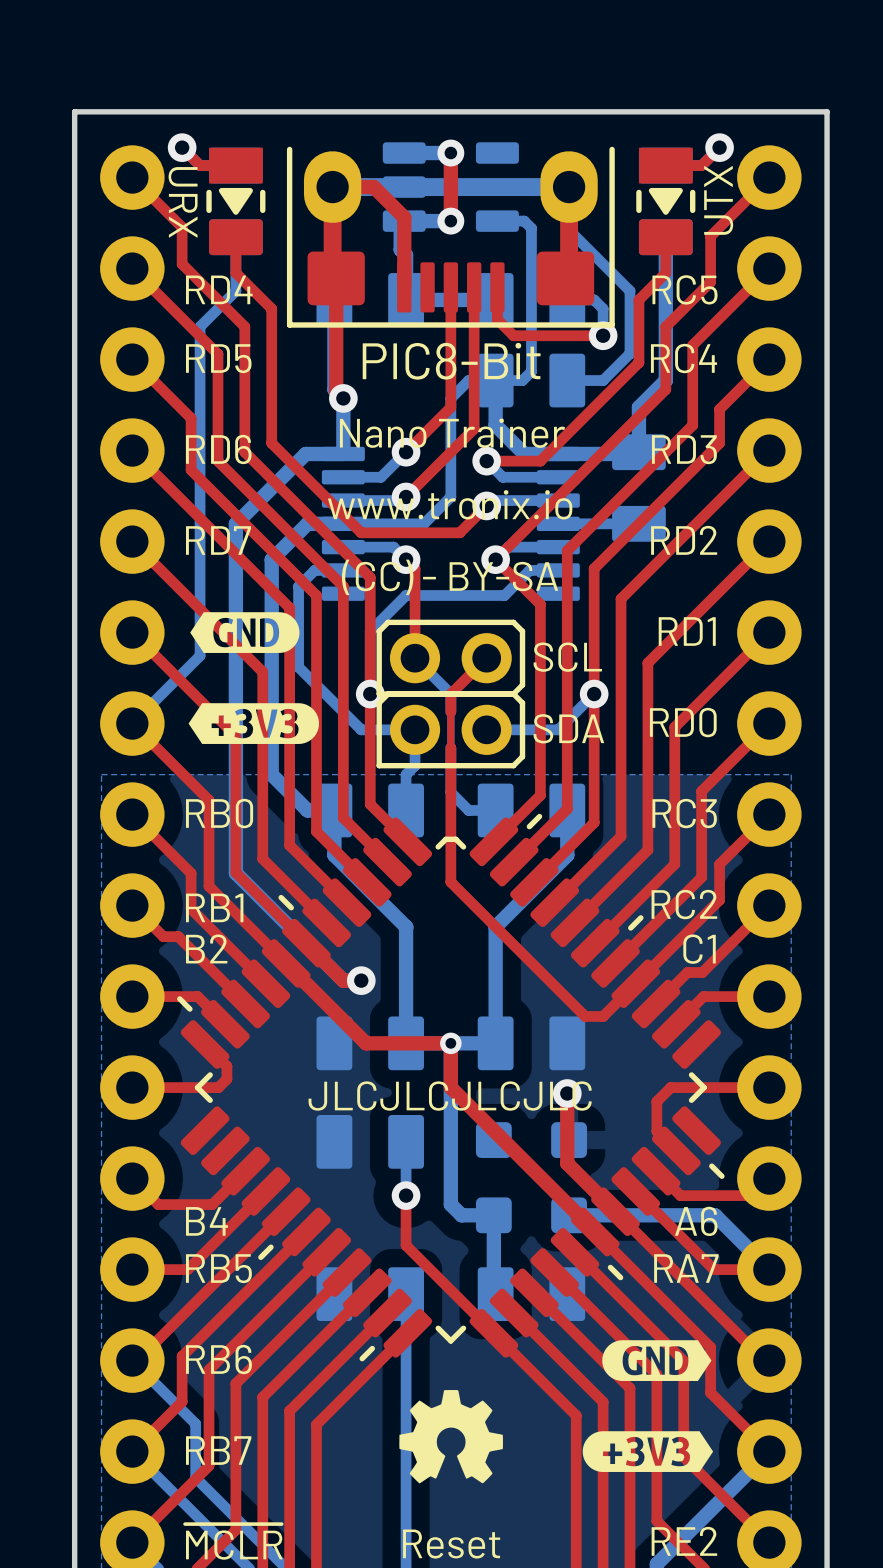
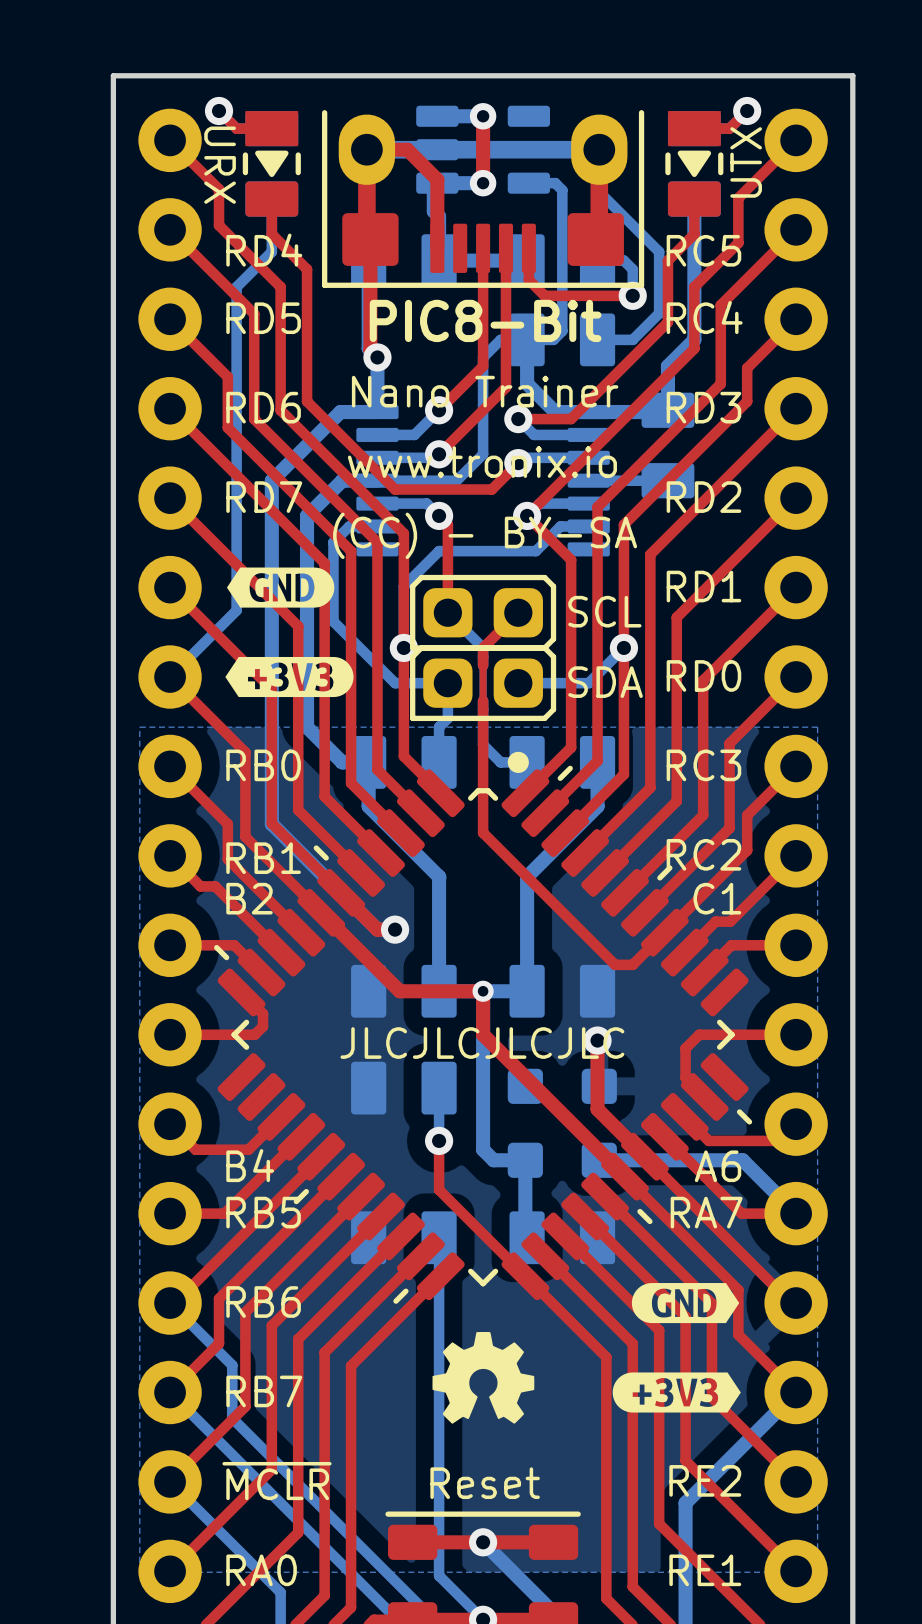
part footprint: [376, 619, 526, 697] -> [410, 574, 557, 651]
part footprint: [376, 691, 526, 769] -> [410, 645, 557, 722]
drawing: none -> [507, 751, 529, 773]

